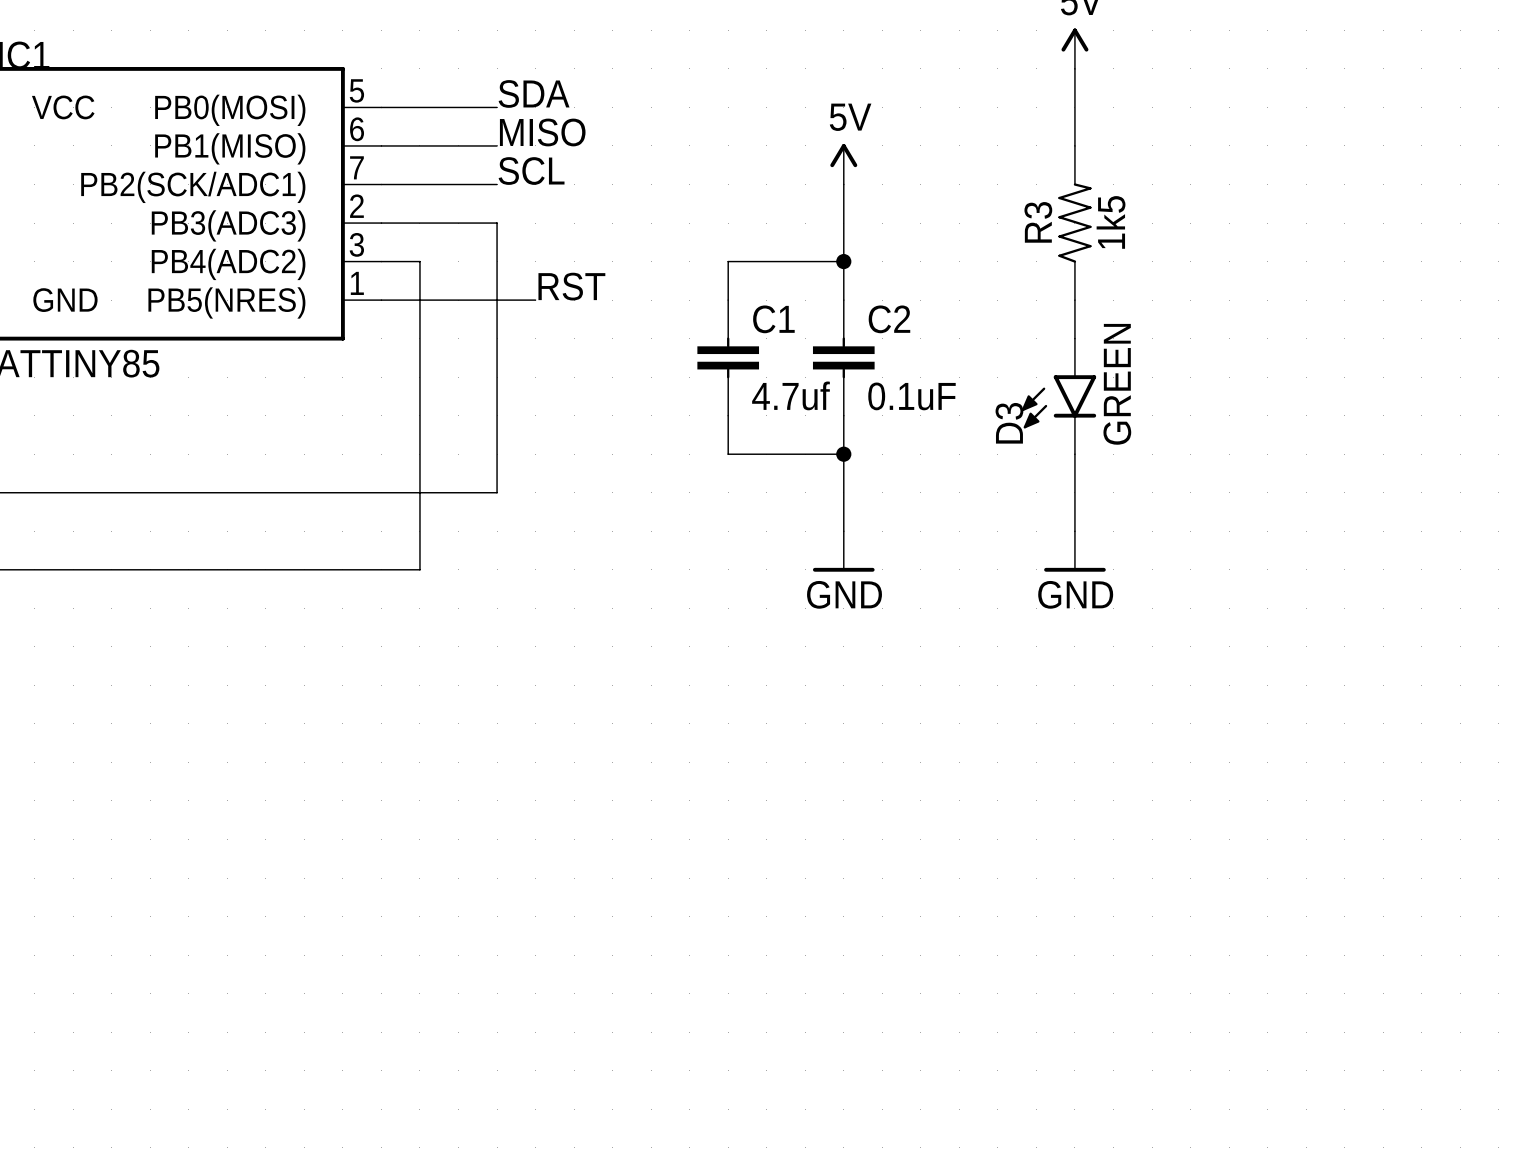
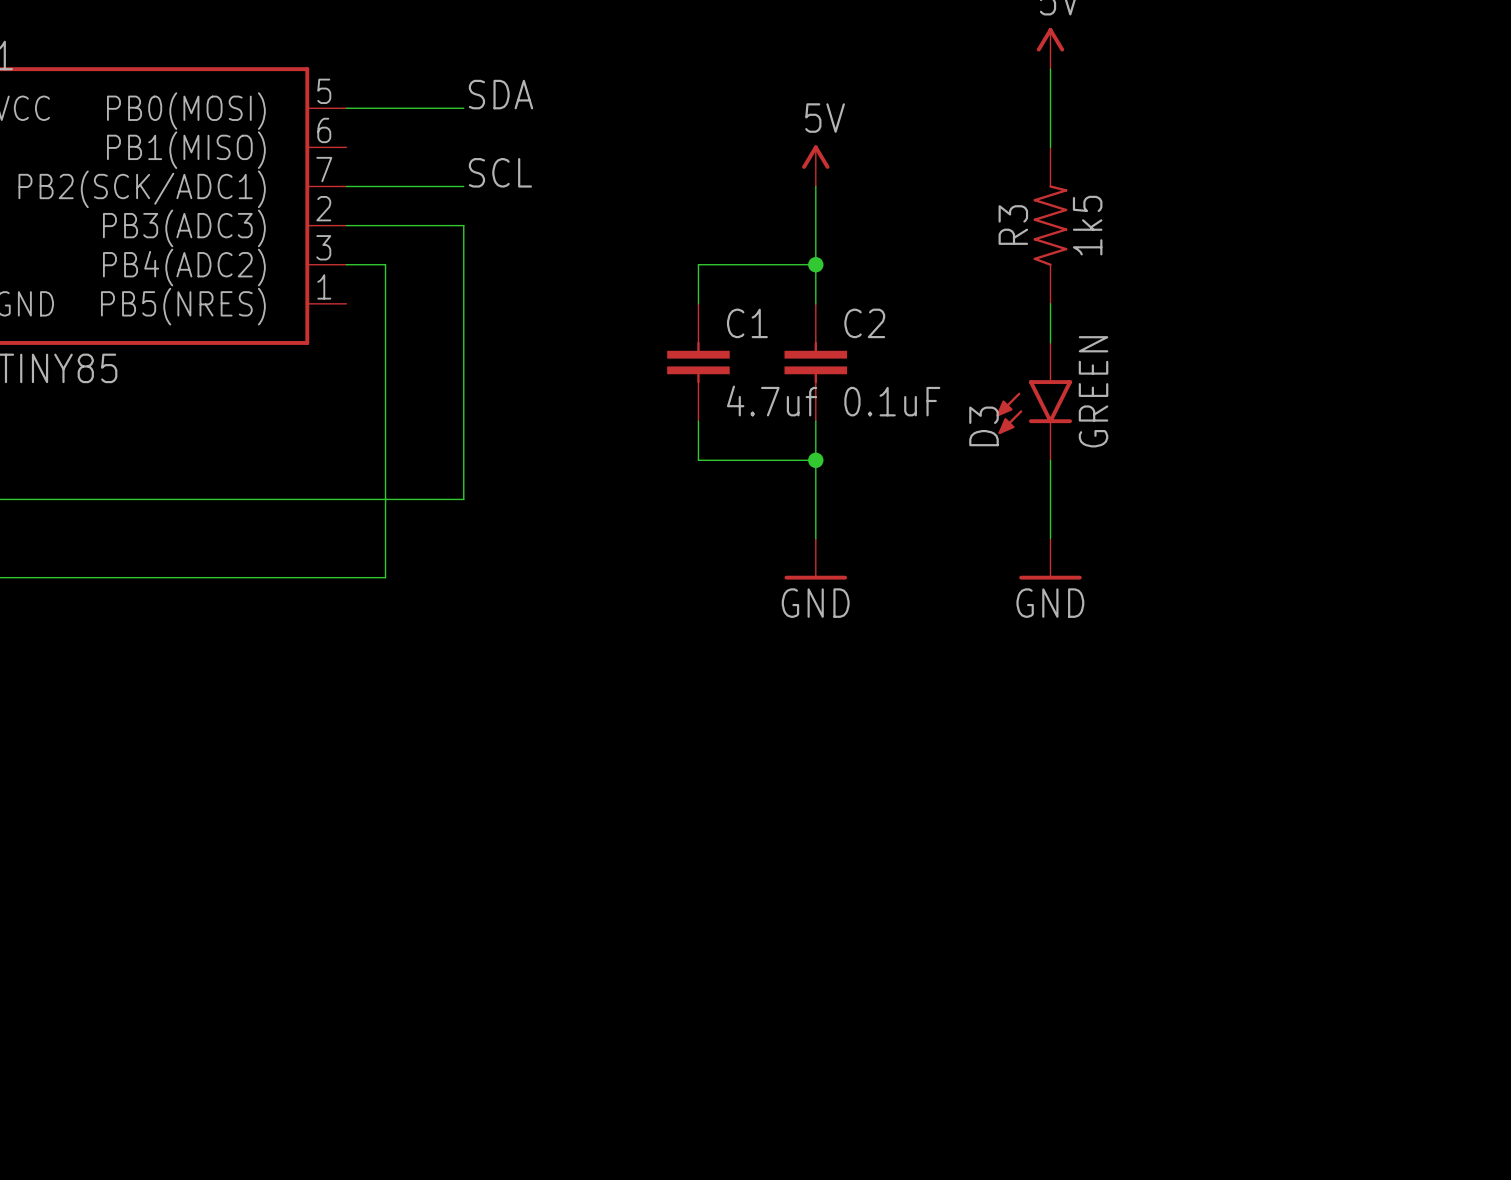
label: MISO (542, 132) -> none
wire: (381, 145) (497, 145) -> none
label: RST (571, 286) -> none
wire: (381, 300) (535, 300) -> none

